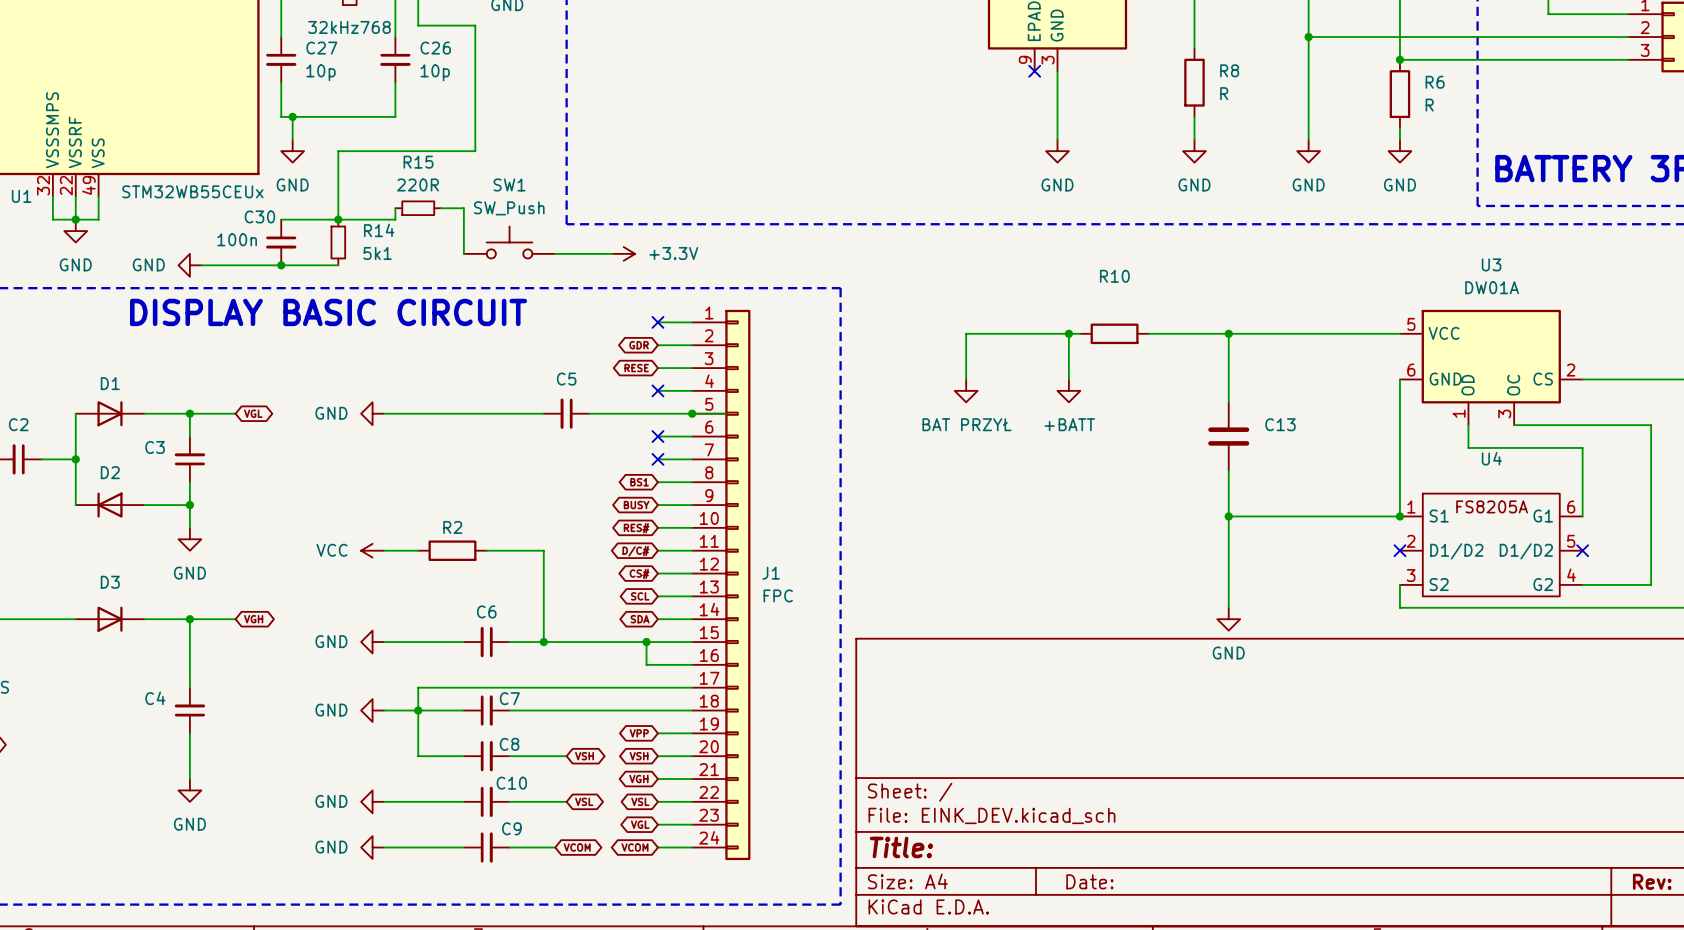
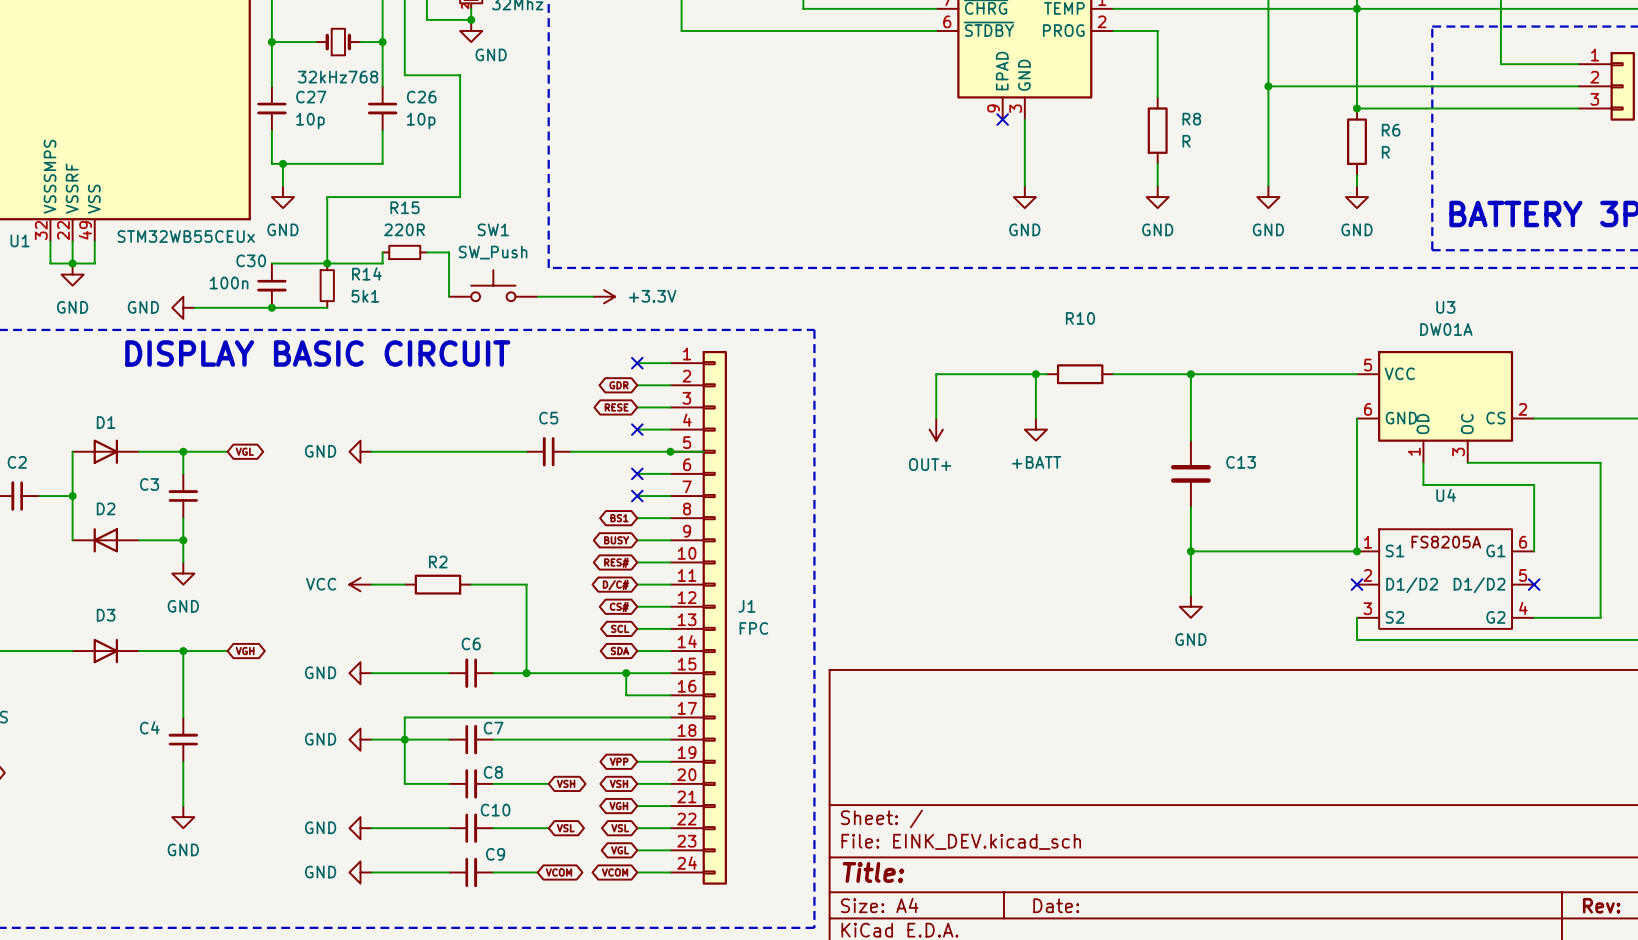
power symbol: BAT PRZYŁ (966, 390) -> OUT+ (936, 429)
wire: (1228, 562) (1228, 607) -> none
power symbol position: GND (1228, 619) -> GND (1190, 606)

